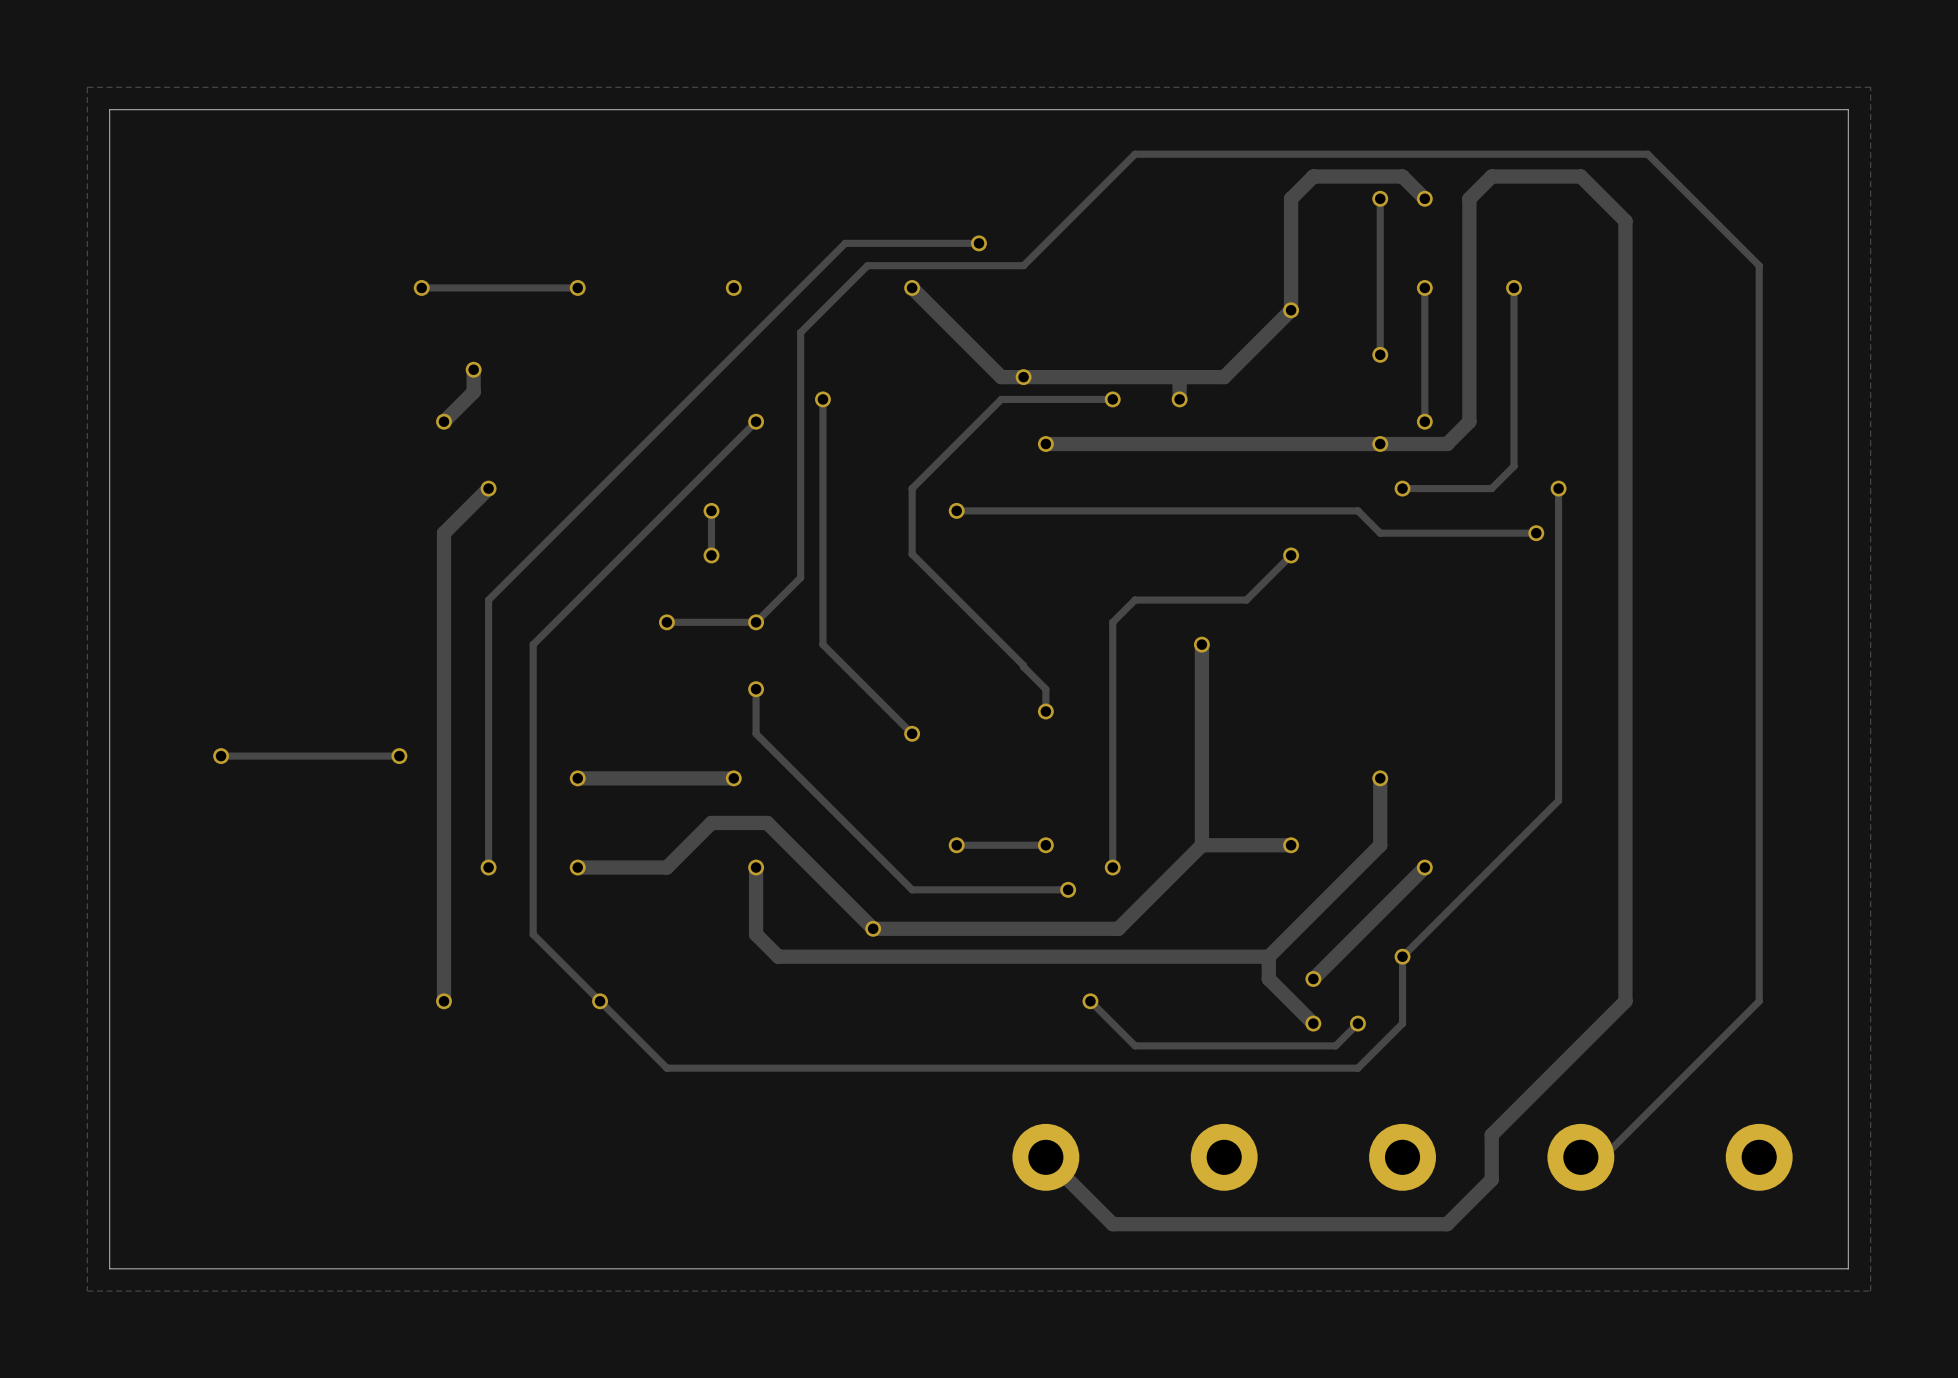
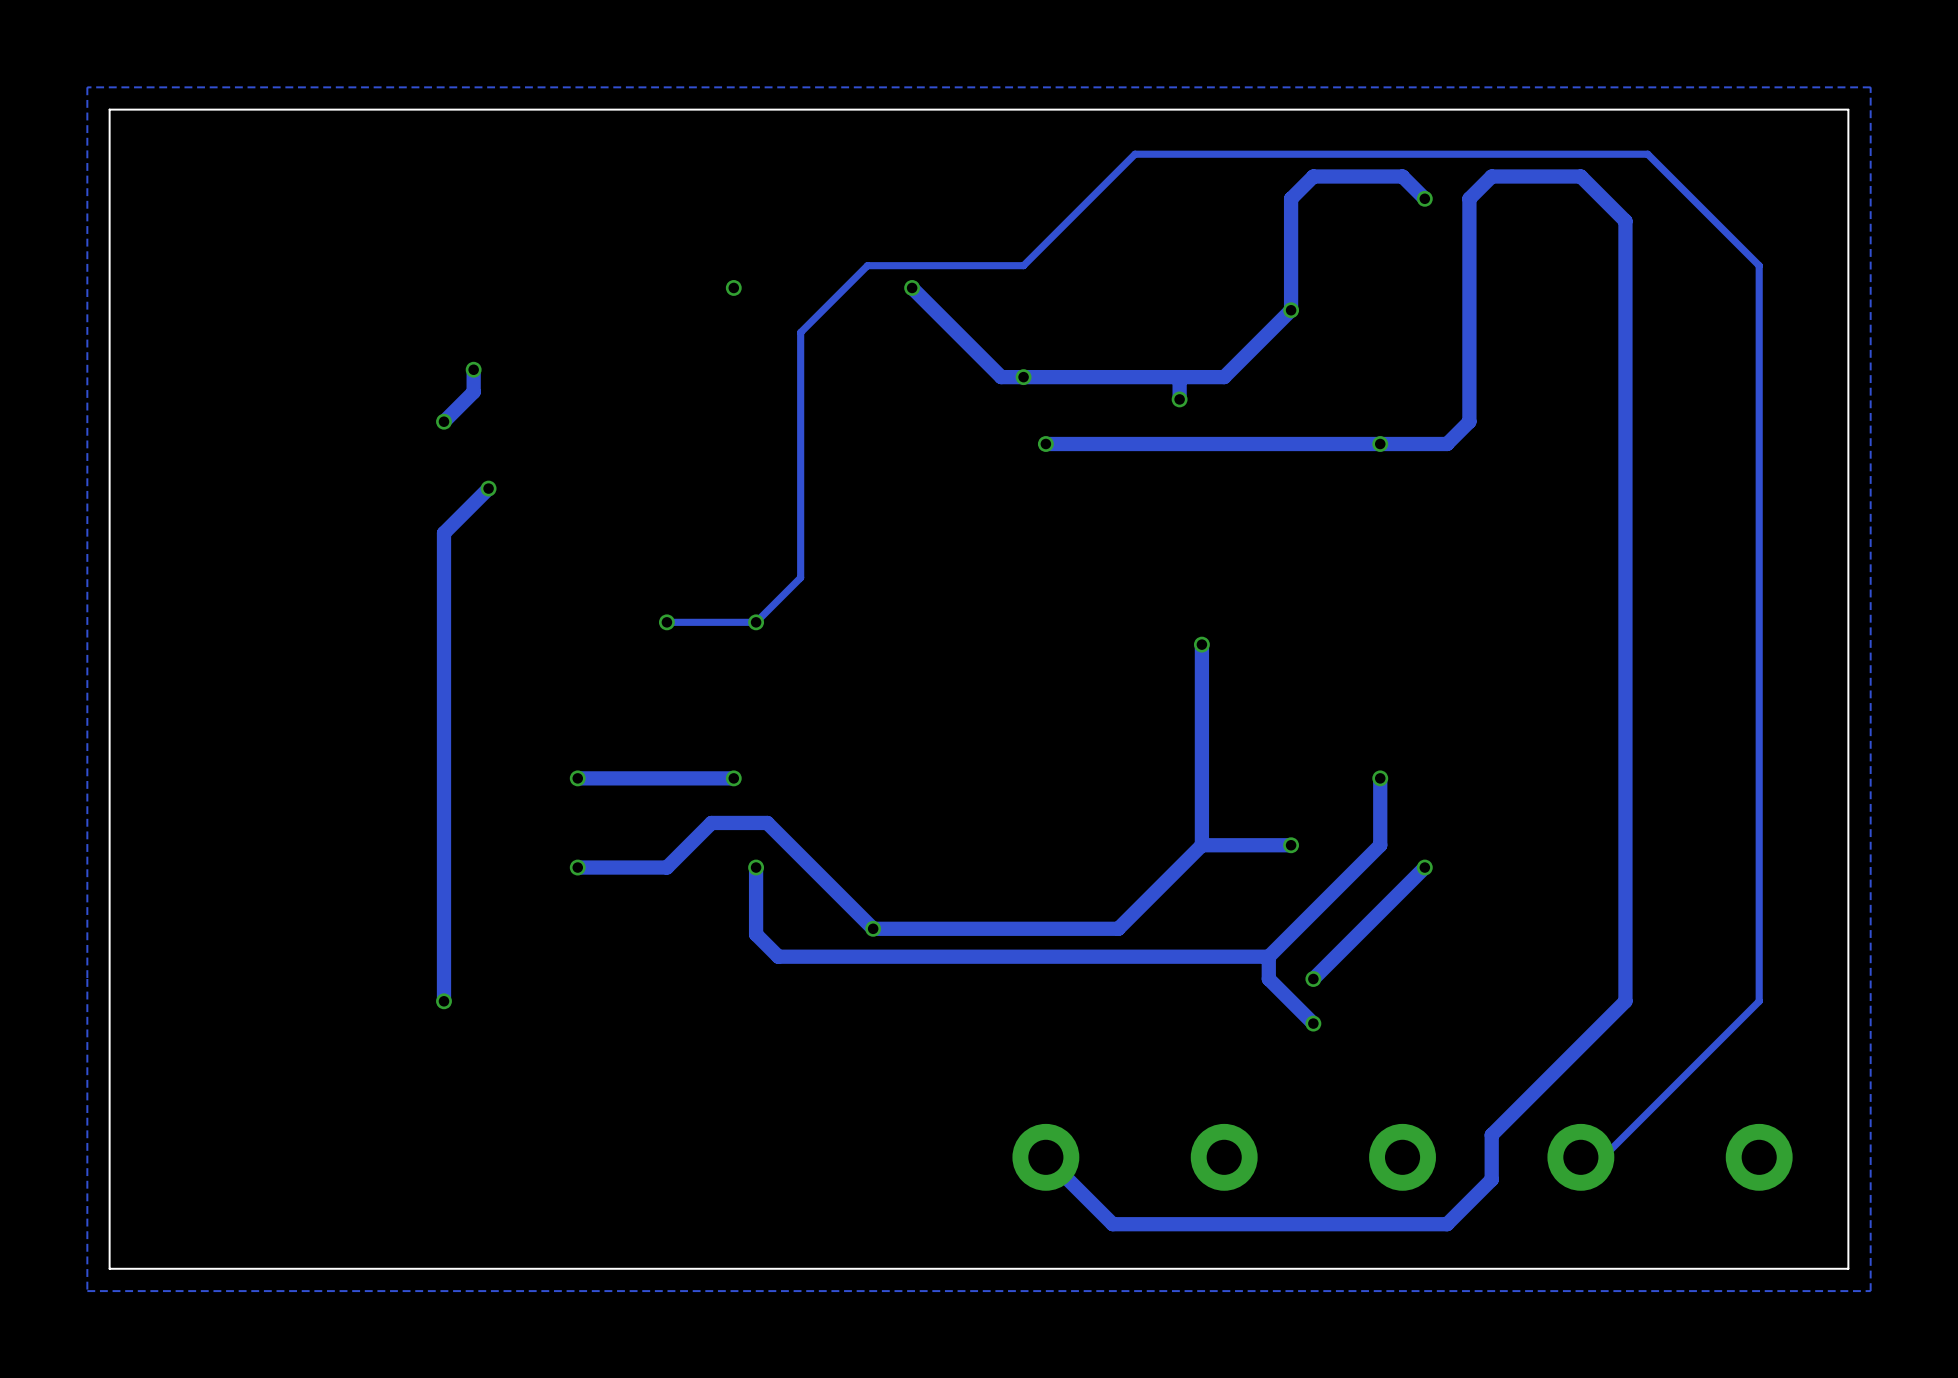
track: (1380, 198) (1380, 354) -> none
via: (1380, 198) -> none
track: (979, 243) (845, 243) (488, 600) (488, 867) -> none
via: (979, 243) -> none
via: (421, 287) -> none
track: (577, 287) (421, 287) -> none
via: (577, 287) -> none
track: (1424, 287) (1424, 421) -> none
via: (1424, 287) -> none
track: (1514, 287) (1514, 466) (1491, 488) (1402, 488) -> none
via: (1514, 287) -> none
via: (1380, 354) -> none
track: (822, 399) (822, 644) (912, 733) -> none
via: (822, 399) -> none
track: (1112, 399) (1001, 399) (912, 488) (912, 554) (1045, 689) (1045, 711) -> none
via: (1112, 399) -> none
track: (756, 421) (533, 644) (533, 934) (666, 1068) (1357, 1068) (1402, 1023) (1402, 956) (1558, 800) (1558, 488) -> none
via: (756, 421) -> none
via: (1424, 421) -> none
via: (1402, 488) -> none
via: (1558, 488) -> none
track: (711, 510) (711, 555) -> none
via: (711, 510) -> none
track: (956, 510) (1357, 510) (1380, 533) (1536, 533) -> none
via: (956, 510) -> none
via: (1536, 533) -> none
via: (711, 555) -> none
track: (1291, 555) (1246, 600) (1135, 600) (1112, 622) (1112, 867) -> none
via: (1291, 555) -> none
track: (756, 689) (756, 733) (912, 889) (1068, 889) -> none
via: (756, 689) -> none
via: (1045, 711) -> none
via: (912, 733) -> none
via: (221, 756) -> none
track: (399, 756) (221, 756) -> none
via: (399, 756) -> none
via: (956, 845) -> none
track: (1045, 845) (956, 845) -> none
via: (1045, 845) -> none
via: (488, 867) -> none
via: (1112, 867) -> none
via: (1068, 889) -> none
via: (1402, 956) -> none
via: (600, 1001) -> none
track: (1090, 1001) (1135, 1045) (1335, 1045) (1357, 1023) -> none
via: (1090, 1001) -> none
via: (1357, 1023) -> none

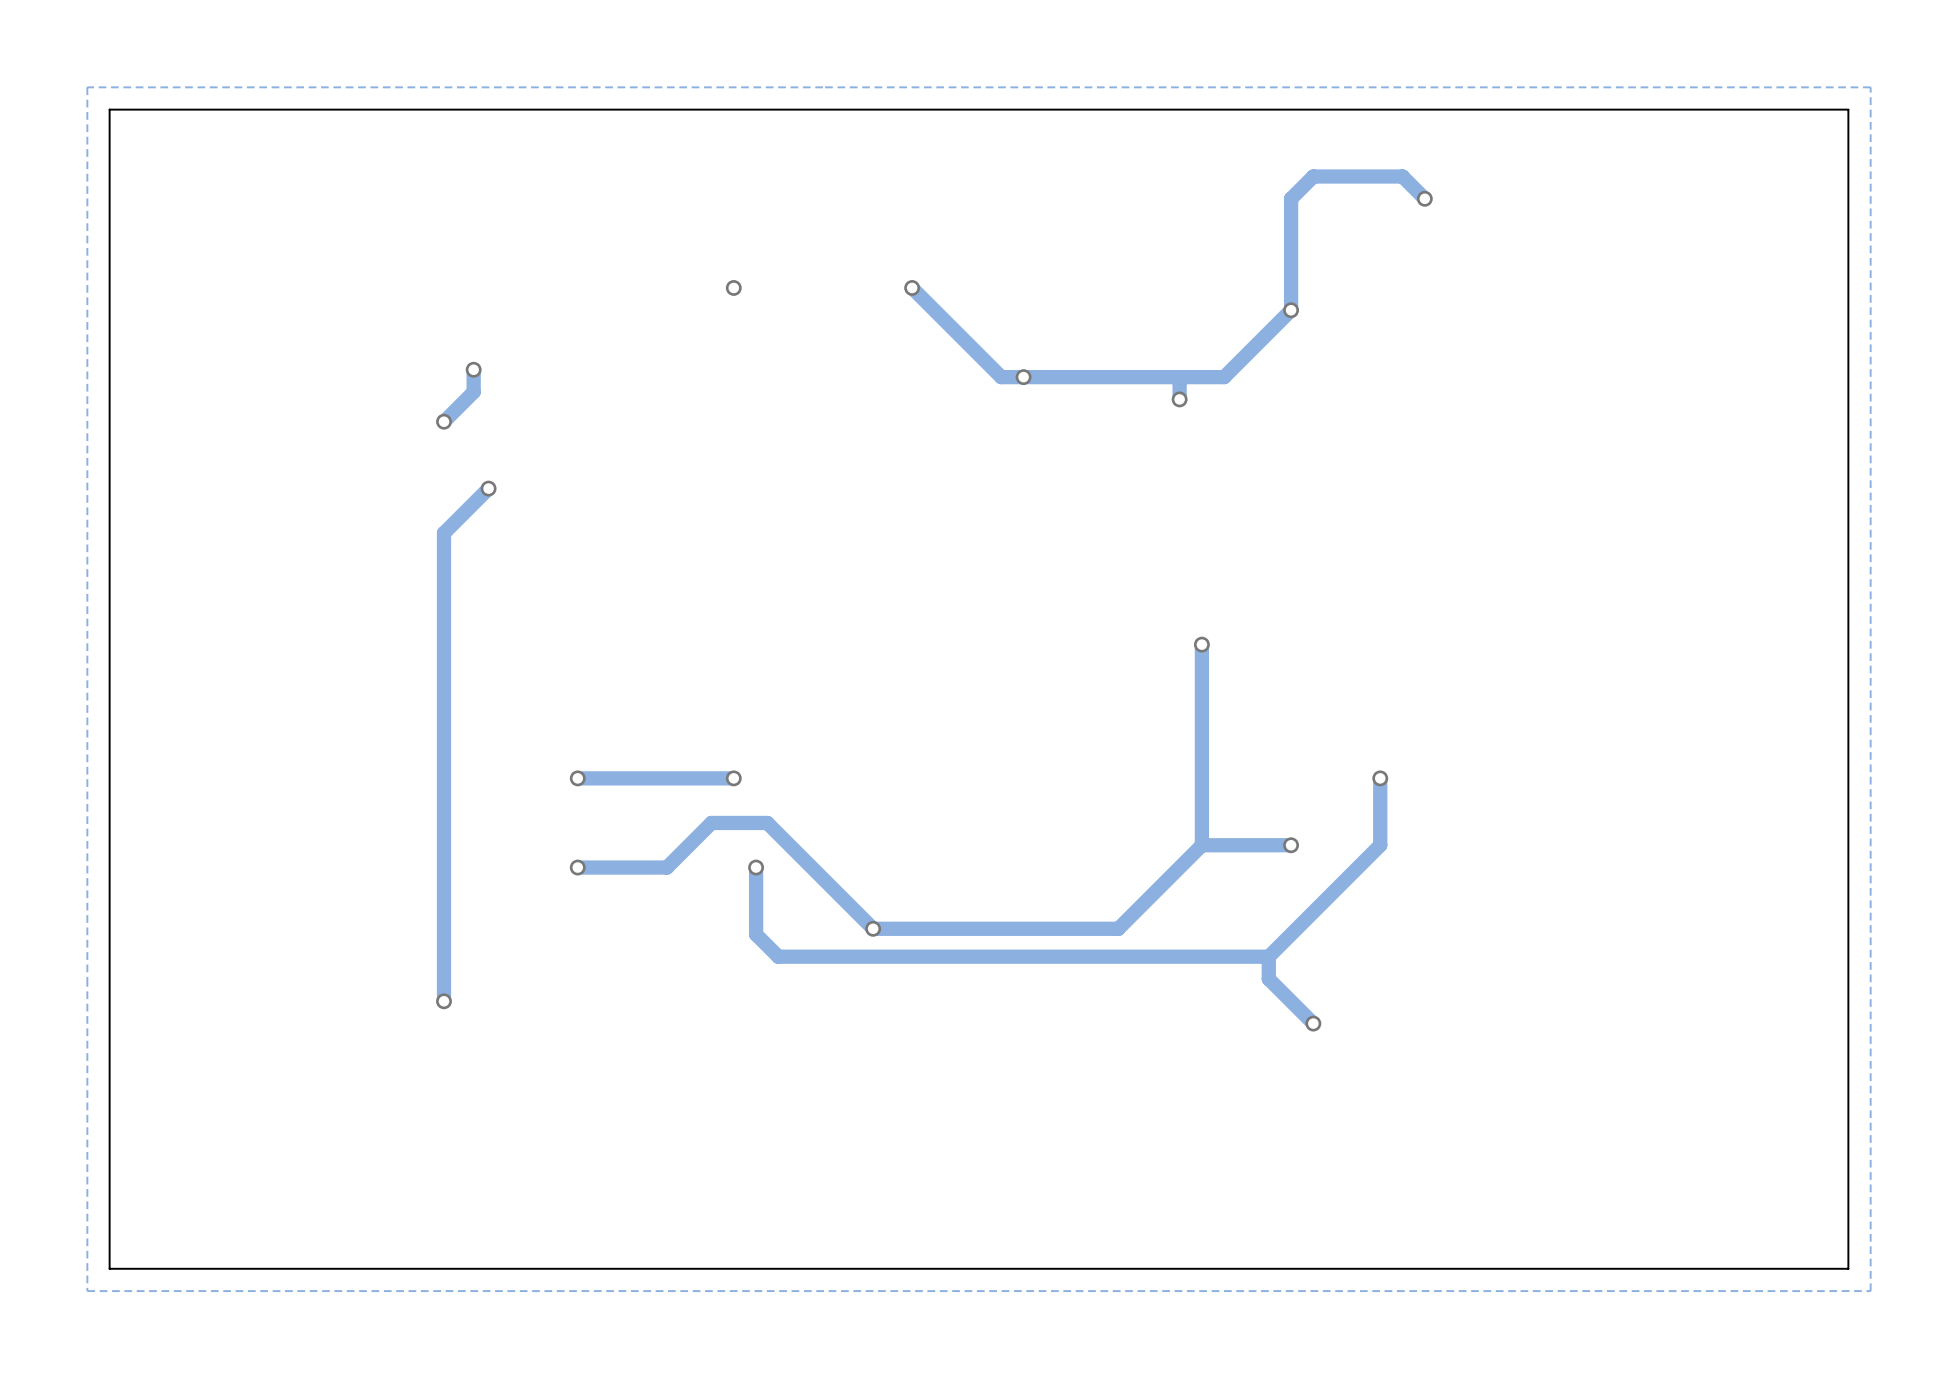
track: (1045, 444) (1447, 444) (1469, 421) (1469, 198) (1491, 176) (1580, 176) (1625, 221) (1625, 1001) (1491, 1135) (1491, 1179) (1447, 1224) (1112, 1224) (1045, 1157) -> none
via: (1045, 444) -> none
via: (1380, 444) -> none
track: (666, 622) (756, 622) (800, 577) (800, 332) (867, 265) (1023, 265) (1135, 154) (1647, 154) (1759, 265) (1759, 1001) (1603, 1157) (1580, 1157) -> none
via: (666, 622) -> none
via: (756, 622) -> none
track: (1424, 867) (1313, 979) -> none
via: (1424, 867) -> none
via: (1313, 979) -> none
part: (1045, 1157) -> none
part: (1224, 1157) -> none
part: (1402, 1157) -> none
part: (1580, 1157) -> none
part: (1759, 1157) -> none

